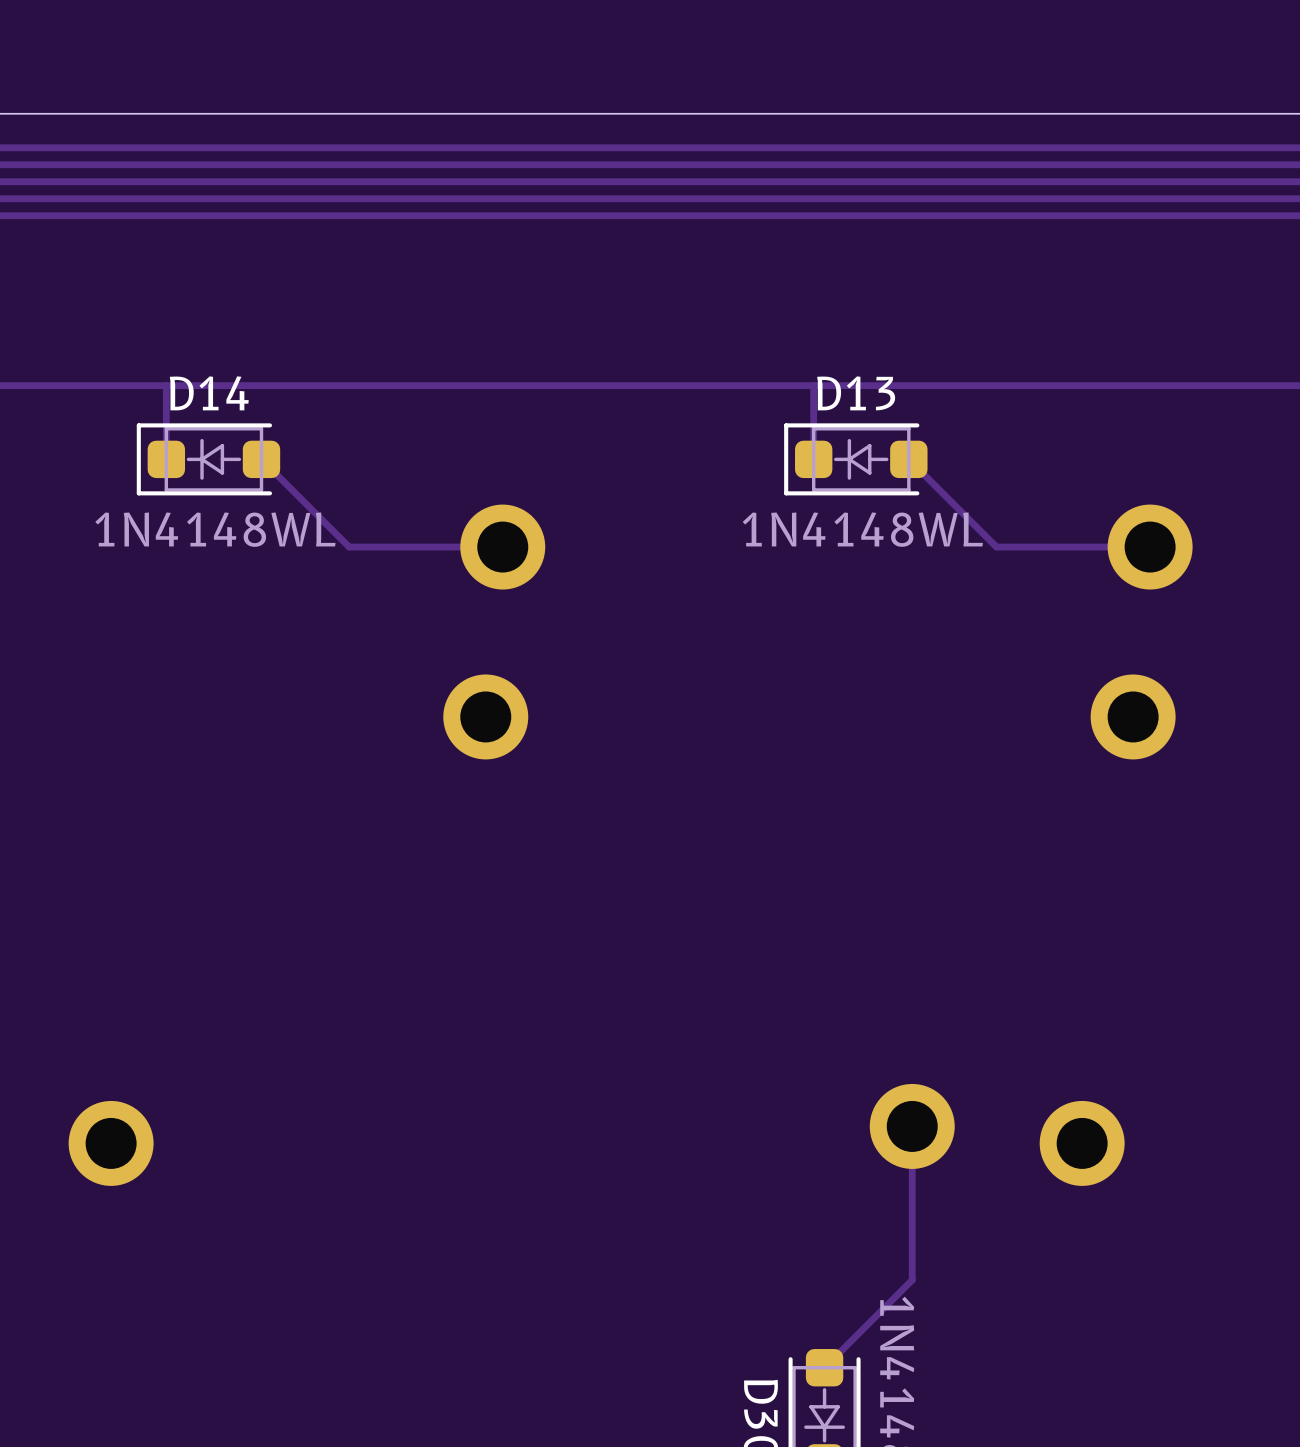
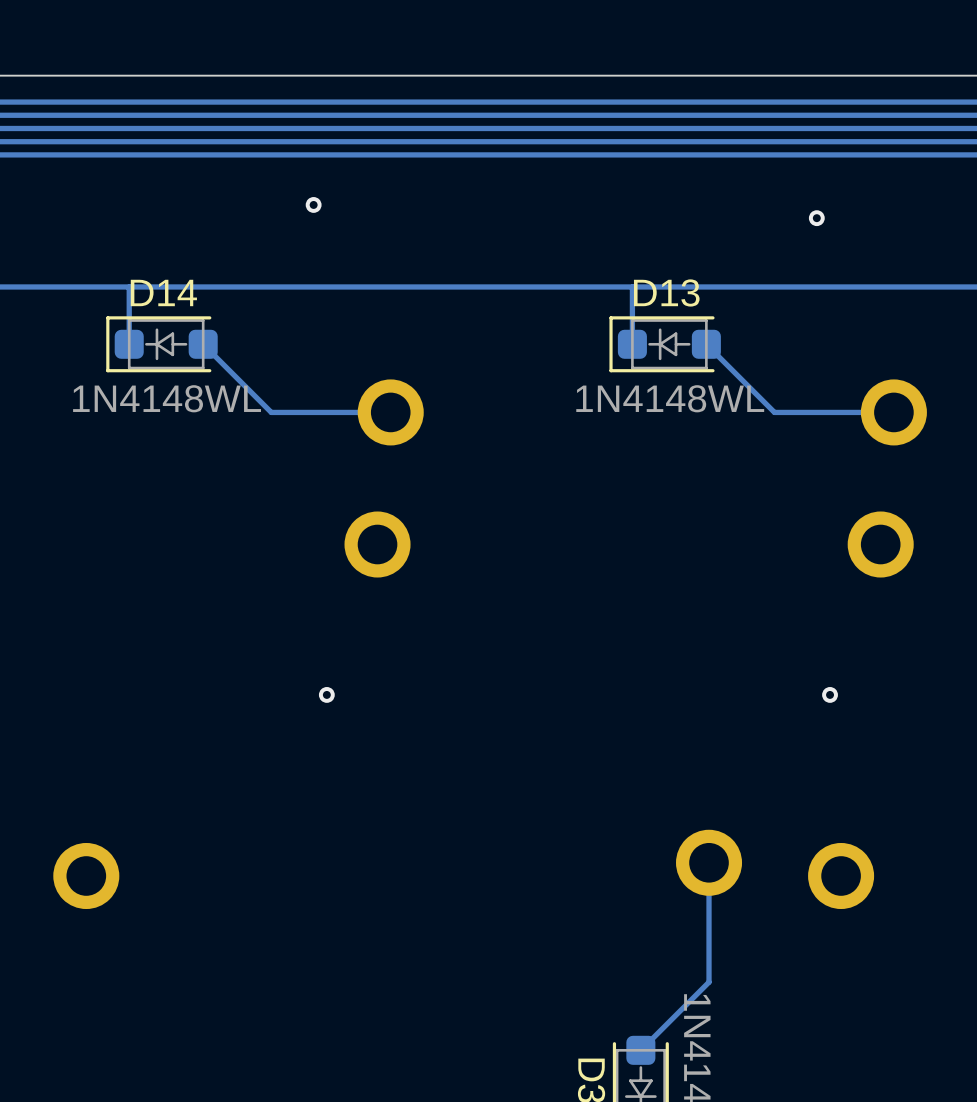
via: none -> (313, 204)
via: none -> (816, 218)
via: none -> (326, 694)
via: none -> (830, 694)

